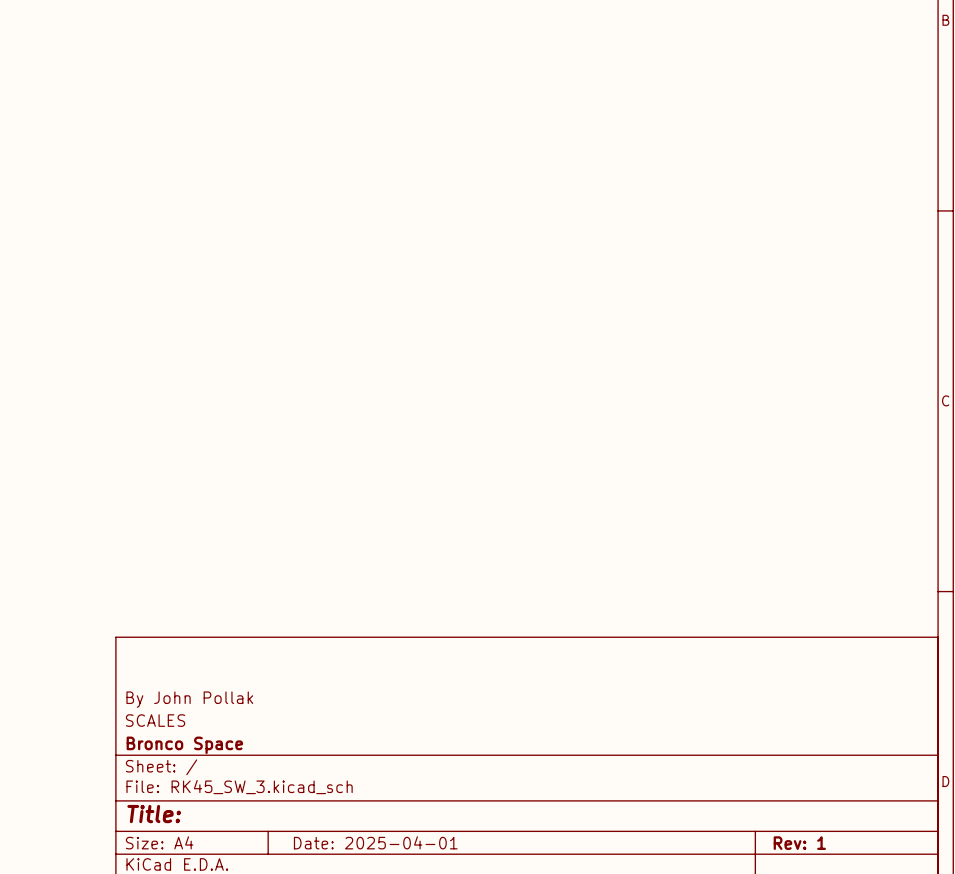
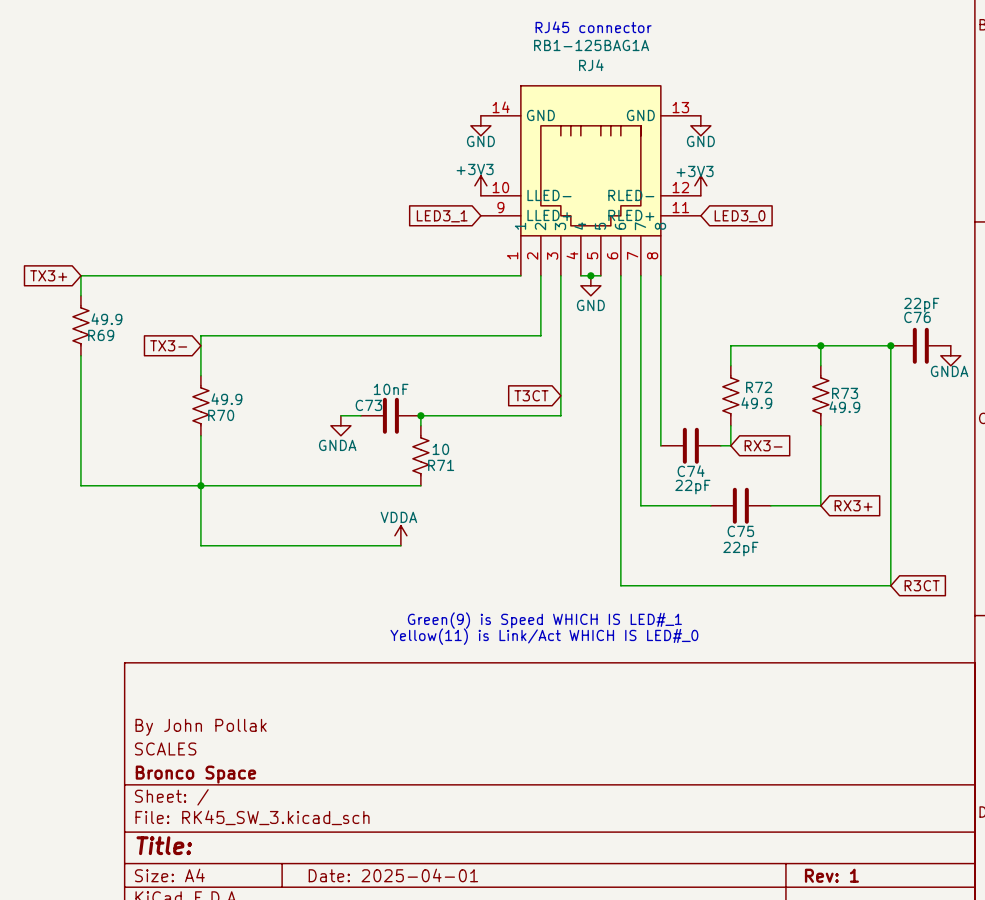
text: none -> RJ45 connector (593, 27)
power symbol: none -> GND (480, 125)
power symbol: none -> GND (700, 125)
RJ4: none -> RB1-125BAG1A (590, 180)
power symbol: none -> +3V3 (480, 185)
power symbol: none -> +3V3 (700, 185)
global label: none -> LED3_1 (442, 216)
global label: none -> LED3_0 (740, 216)
global label: none -> TX3+ (48, 275)
wire: none -> (520, 275) (80, 275) (80, 295)
wire: none -> (540, 275) (540, 335) (200, 335) (200, 375)
wire: none -> (560, 275) (560, 415) (420, 415) (420, 425)
wire: none -> (580, 275) (600, 275)
junction: none -> (590, 275)
wire: none -> (620, 275) (620, 585) (890, 585) (890, 345) (730, 345) (730, 365)
wire: none -> (640, 275) (640, 505) (710, 505)
wire: none -> (660, 275) (660, 445)
power symbol: none -> GND (590, 285)
R69: none -> 49.9 (80, 325)
global label: none -> TX3- (168, 345)
wire: none -> (820, 345) (820, 365)
junction: none -> (820, 345)
junction: none -> (890, 345)
C76: none -> 22pF (920, 345)
wire: none -> (80, 355) (80, 485) (420, 485)
power symbol: none -> GNDA (950, 355)
global label: none -> T3CT (531, 395)
R72: none -> 49.9 (730, 395)
R73: none -> 49.9 (820, 395)
R70: none -> 49.9 (200, 405)
wire: none -> (340, 415) (360, 415)
C73: none -> 10nF (390, 415)
junction: none -> (420, 415)
power symbol: none -> GNDA (340, 425)
wire: none -> (730, 425) (730, 445) (720, 445)
wire: none -> (820, 425) (820, 505) (770, 505)
wire: none -> (200, 435) (200, 545) (400, 545)
C74: none -> 22pF (690, 445)
global label: none -> RX3- (763, 445)
R71: none -> 10 (420, 455)
junction: none -> (200, 485)
C75: none -> 22pF (740, 505)
global label: none -> RX3+ (853, 505)
power symbol: none -> VDDA (400, 535)
global label: none -> R3CT (922, 585)
text: none -> Green(9) is Speed WHICH IS LED#_1 (544, 620)
text: none -> Yellow(11) is Link/Act WHICH IS LED#_0 (544, 636)

